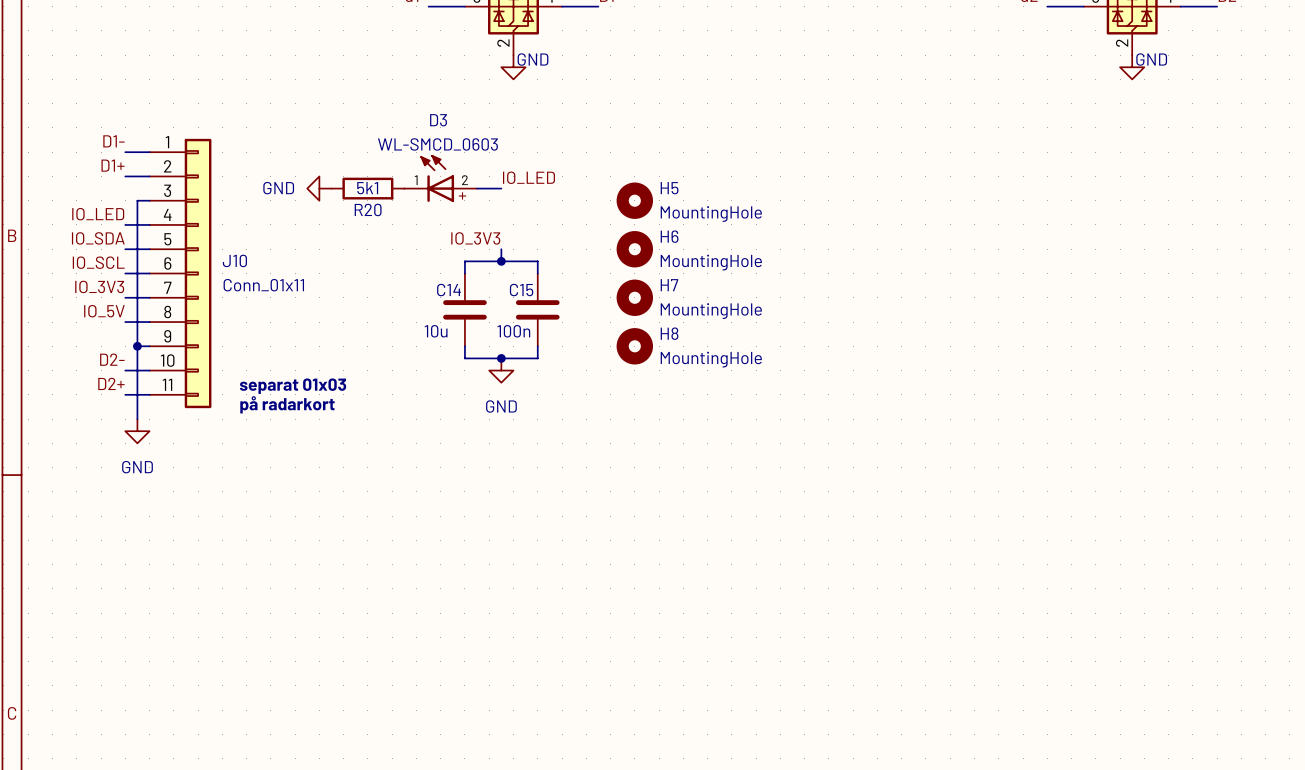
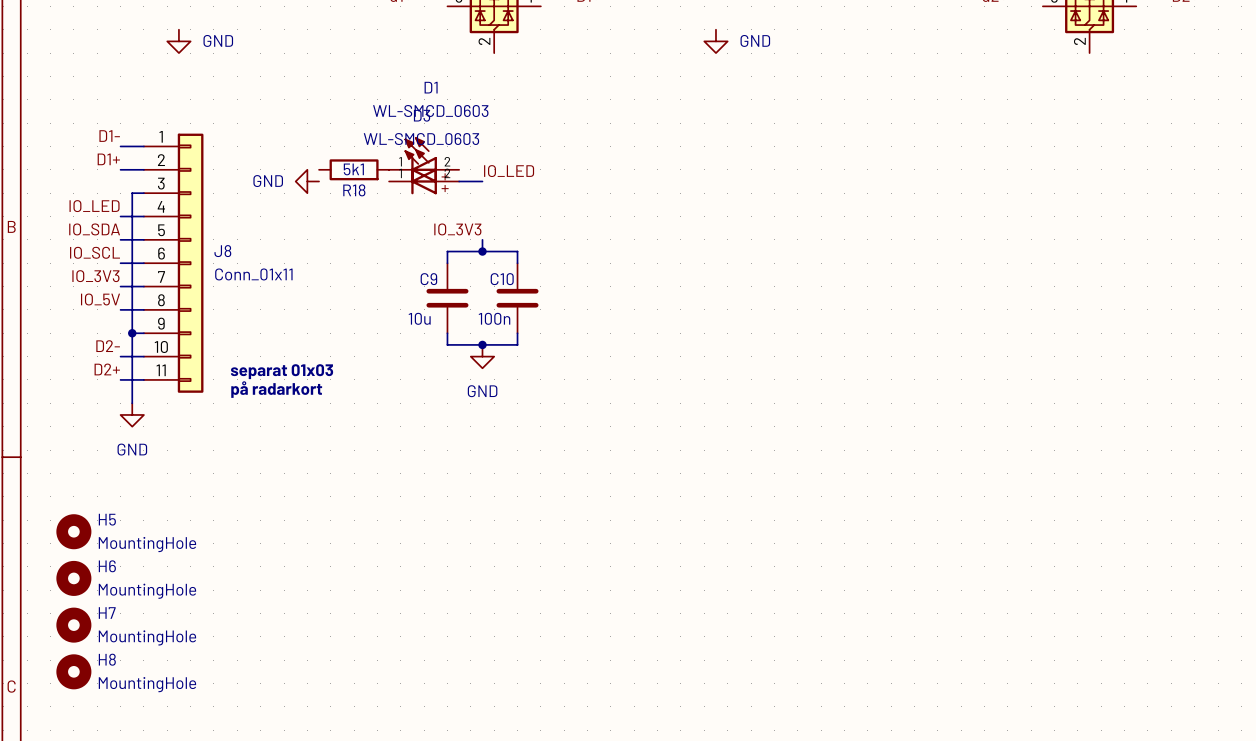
wire: (428, 6) (464, 6) -> none
wire: (562, 6) (598, 6) -> none
wire: (1047, 6) (1083, 6) -> none
wire: (1180, 6) (1217, 6) -> none
power symbol: none -> GND (178, 41)
power symbol: none -> GND (715, 41)
power symbol: GND (513, 67) -> none
power symbol: GND (1132, 67) -> none
D1: none -> WL-SMCD_0603 (424, 160)
R18: none -> 5k1 (354, 169)
R20: 5k1 (367, 188) -> none
H5 position: (634, 200) -> (73, 531)
H6 position: (634, 249) -> (73, 578)
J10 name: J10 (234, 260) -> J8 (222, 251)
C14 name: C14 (449, 290) -> C9 (428, 279)
C15 name: C15 (521, 290) -> C10 (502, 279)
H7 position: (634, 297) -> (73, 625)
H8 position: (634, 346) -> (73, 671)

